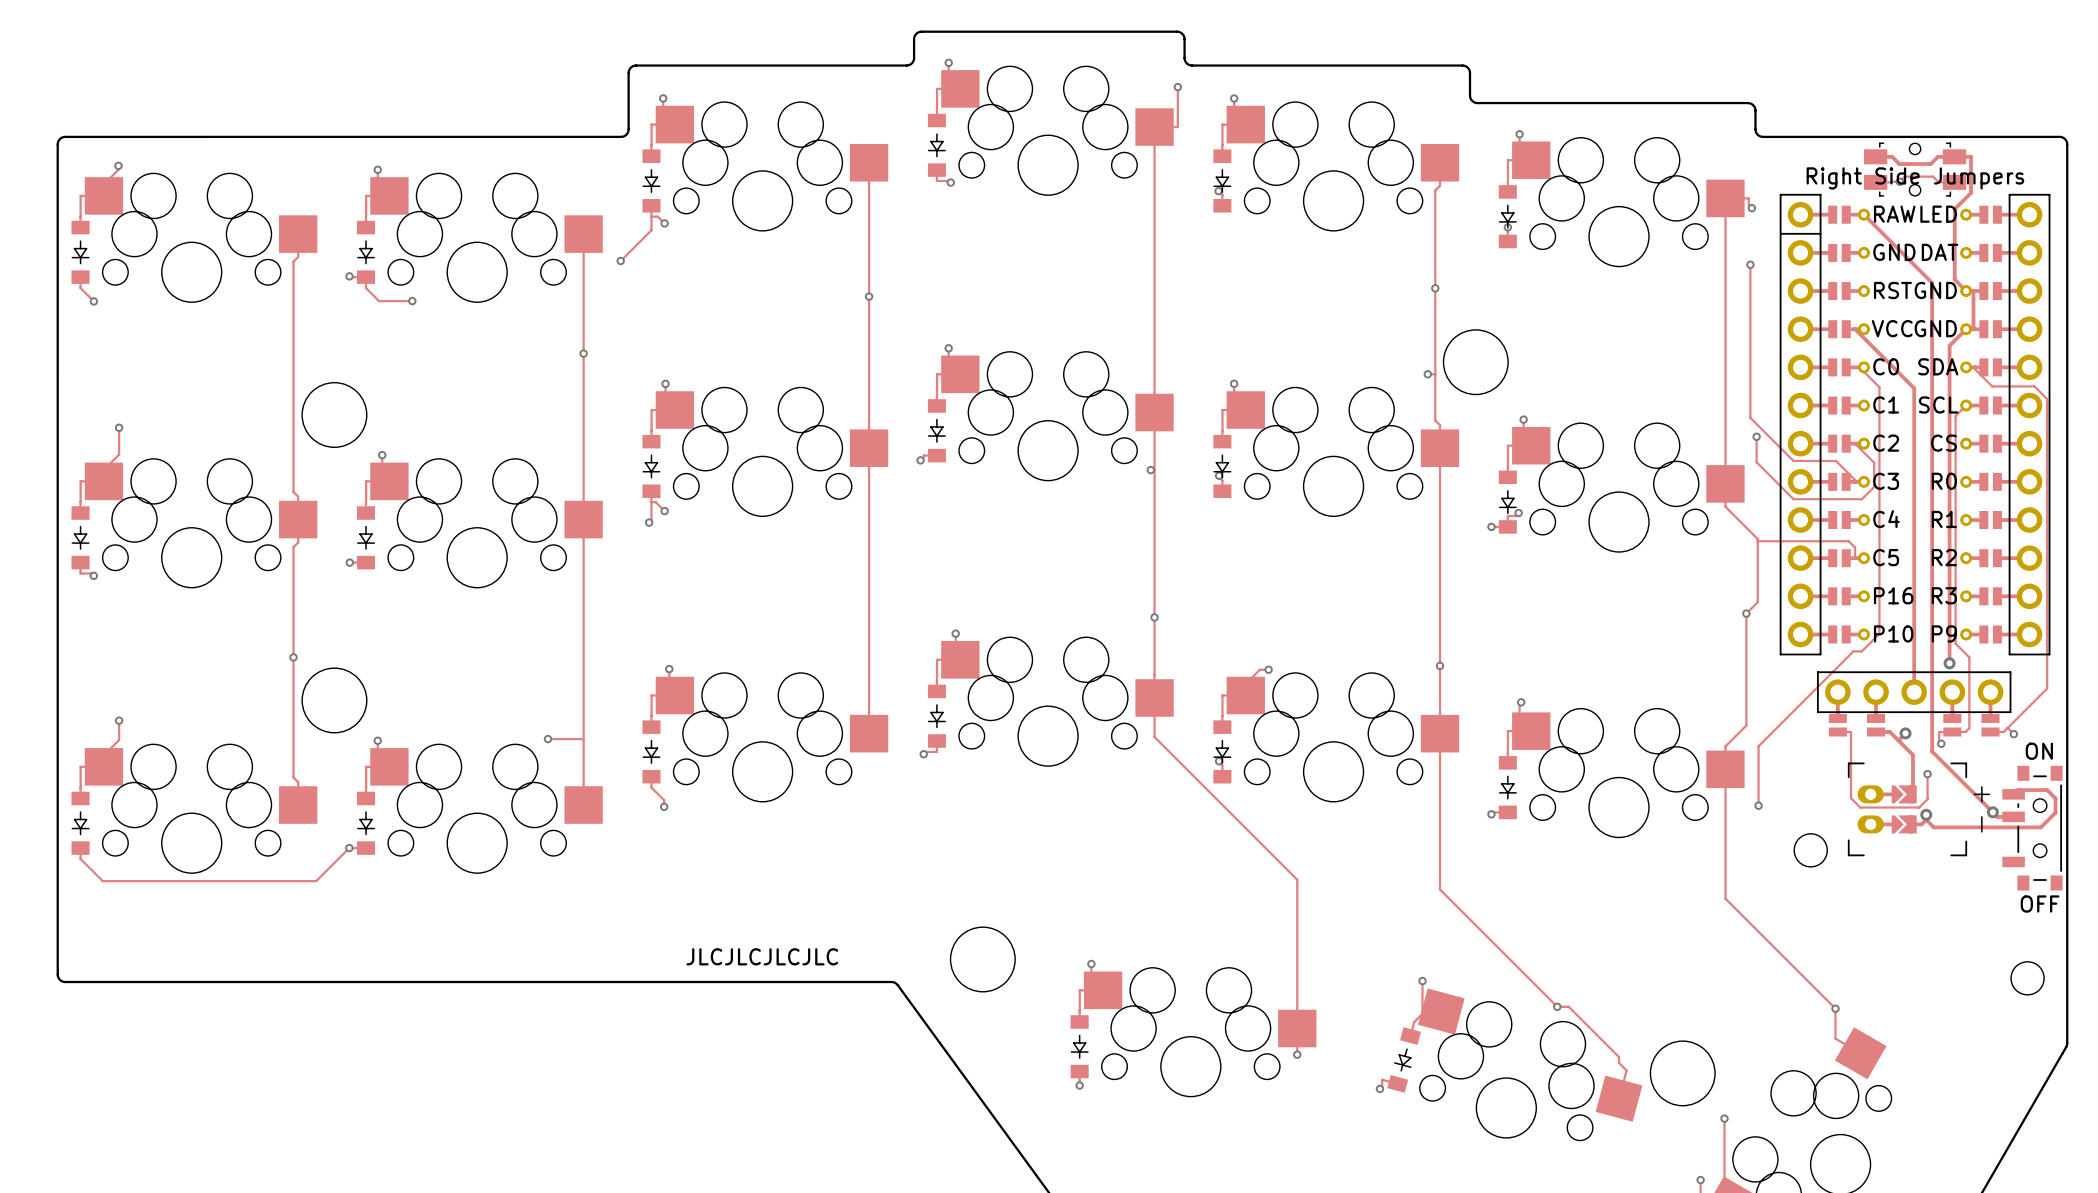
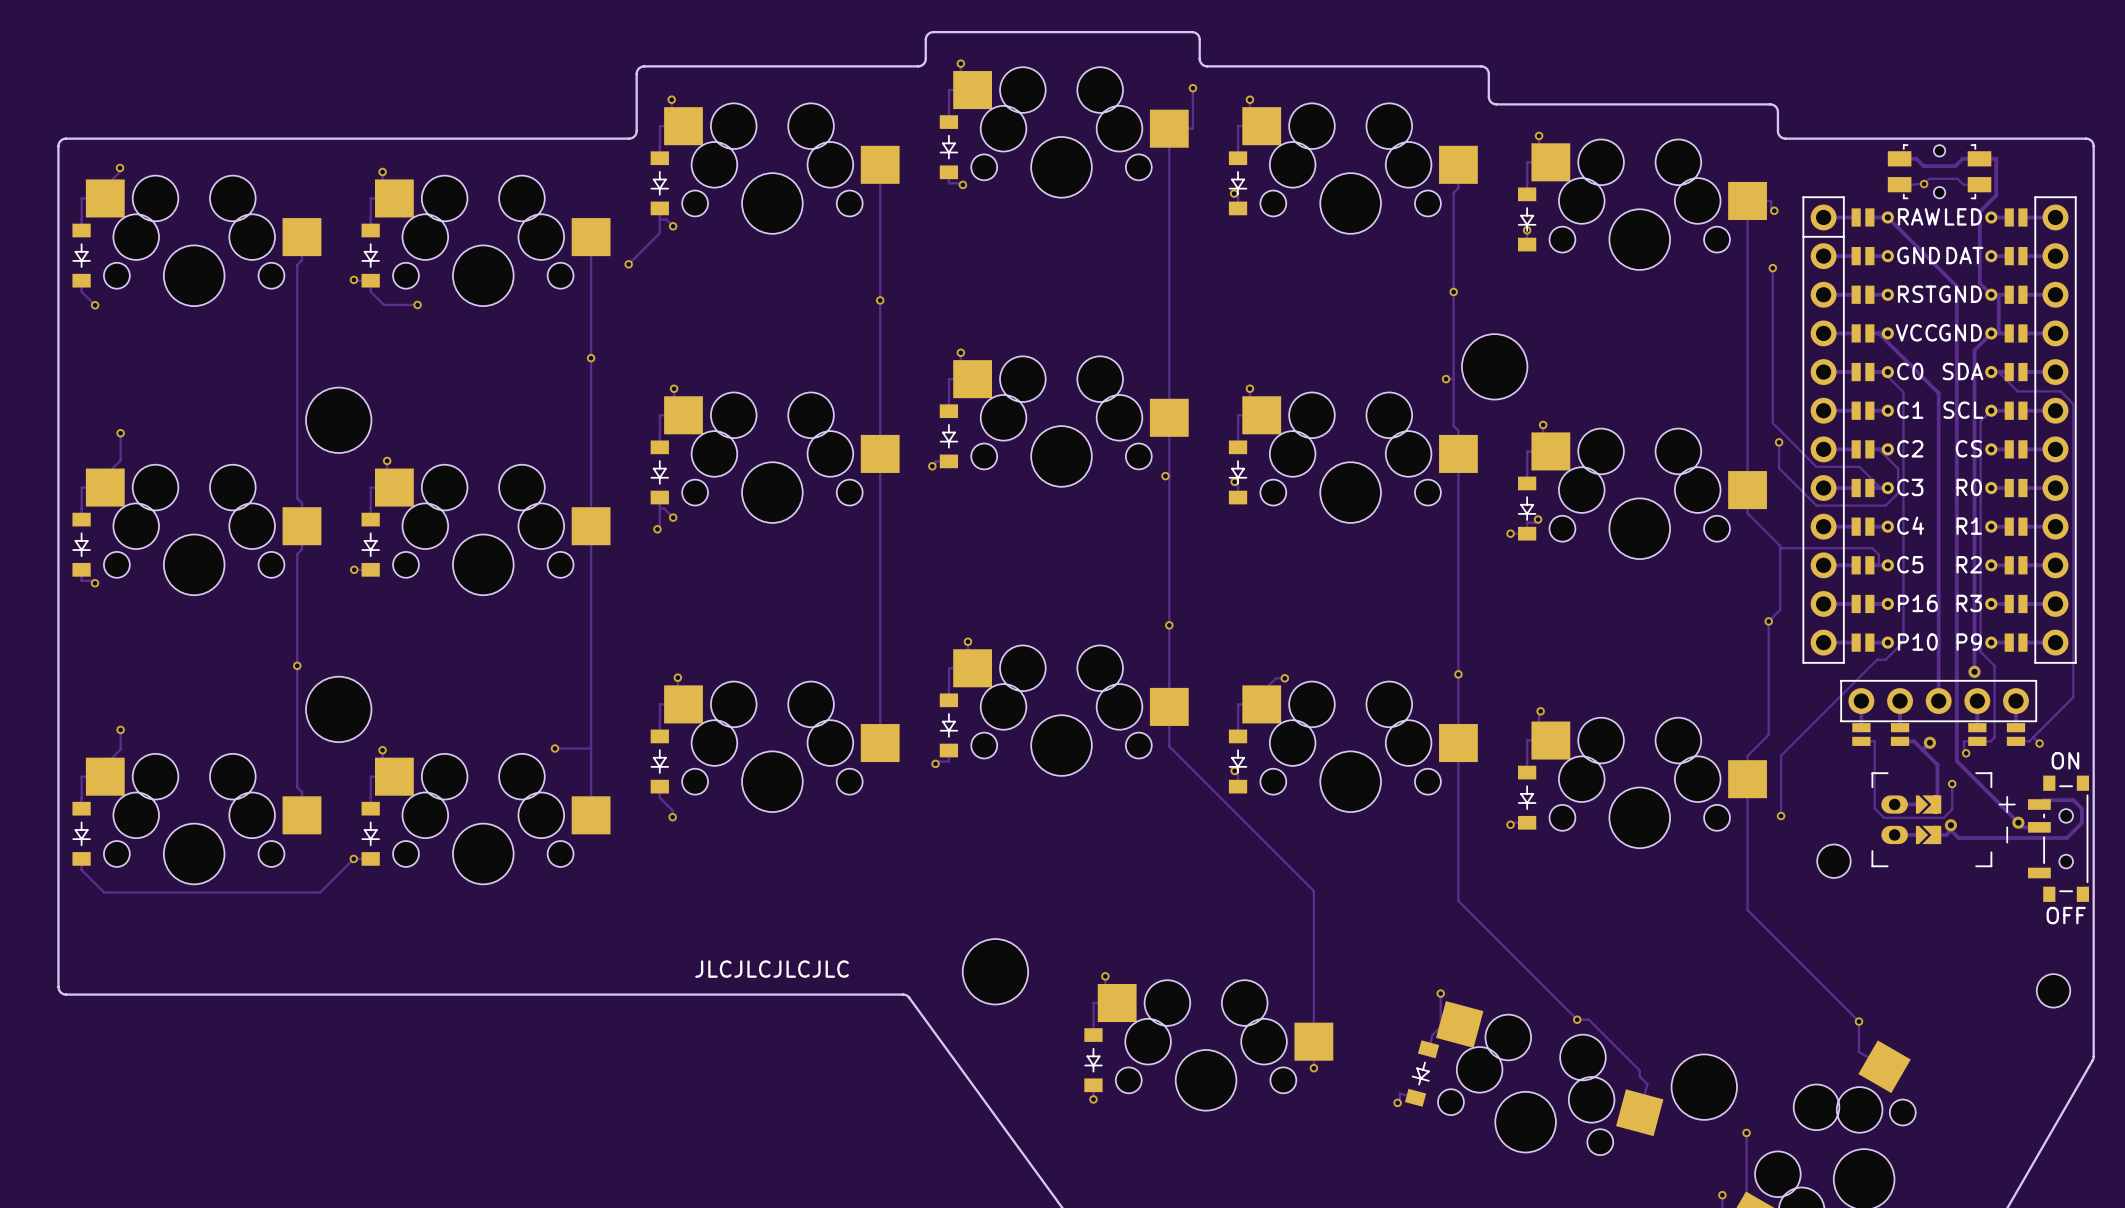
part text: Right Side Jumpers (1915, 178) -> none

